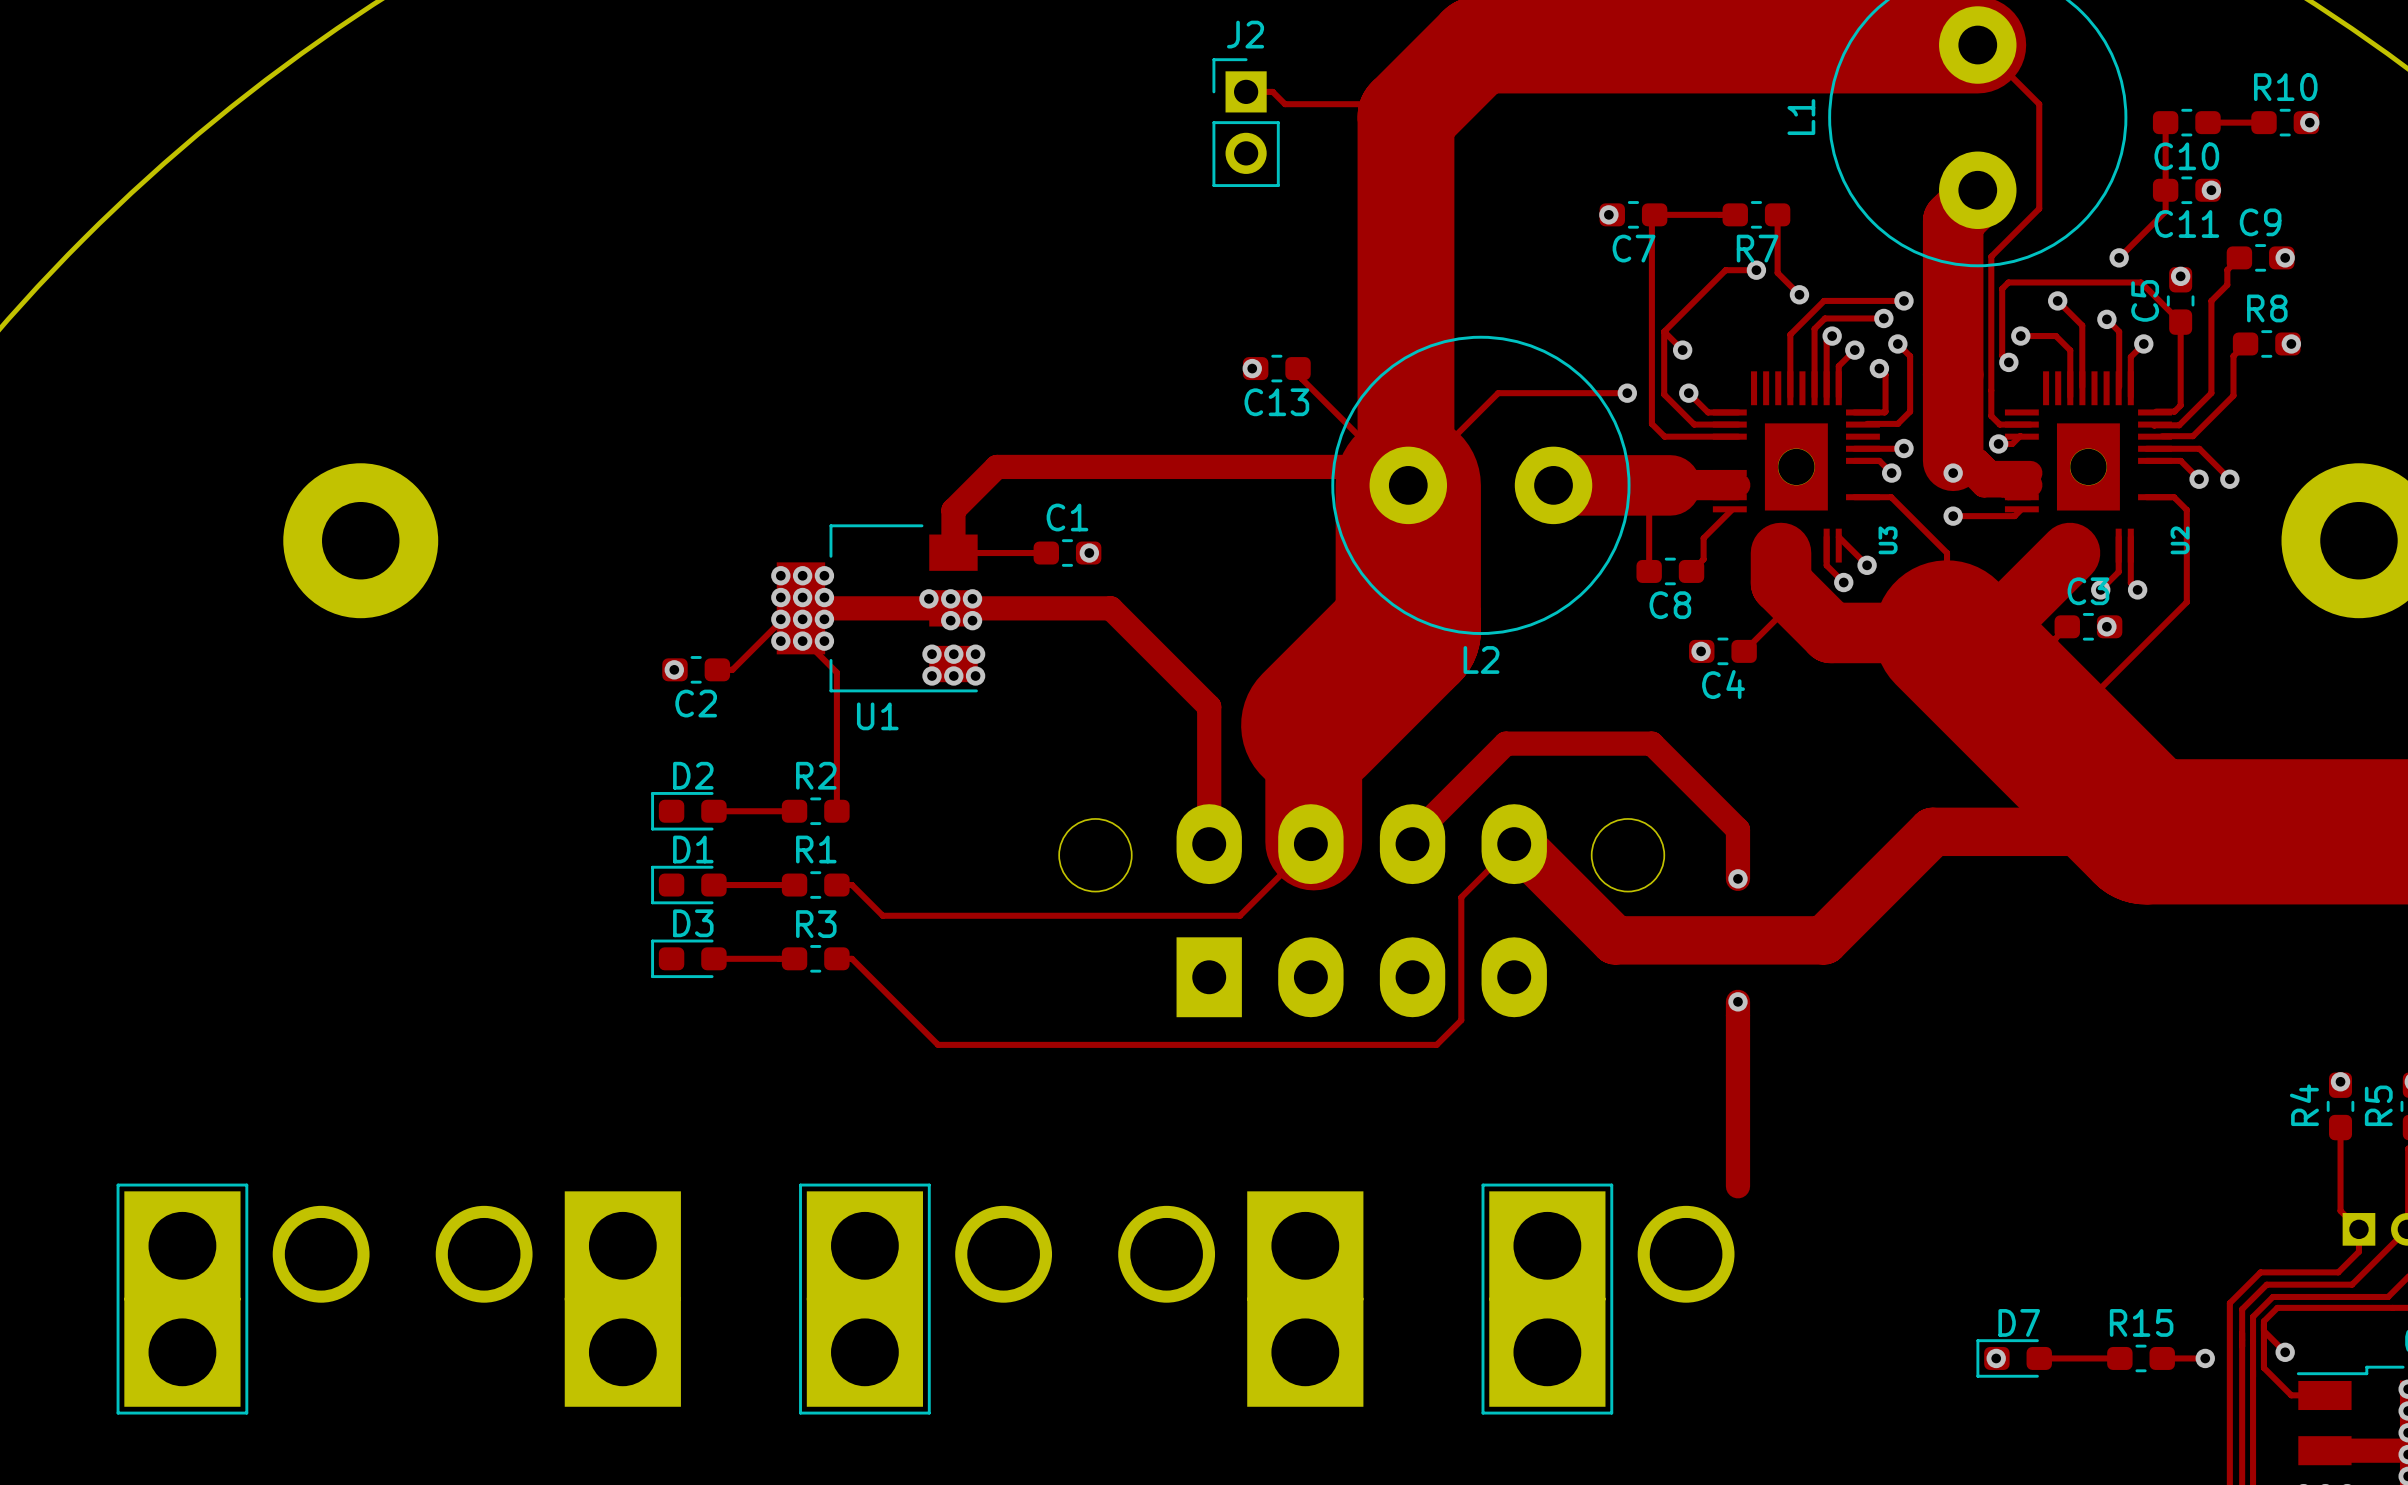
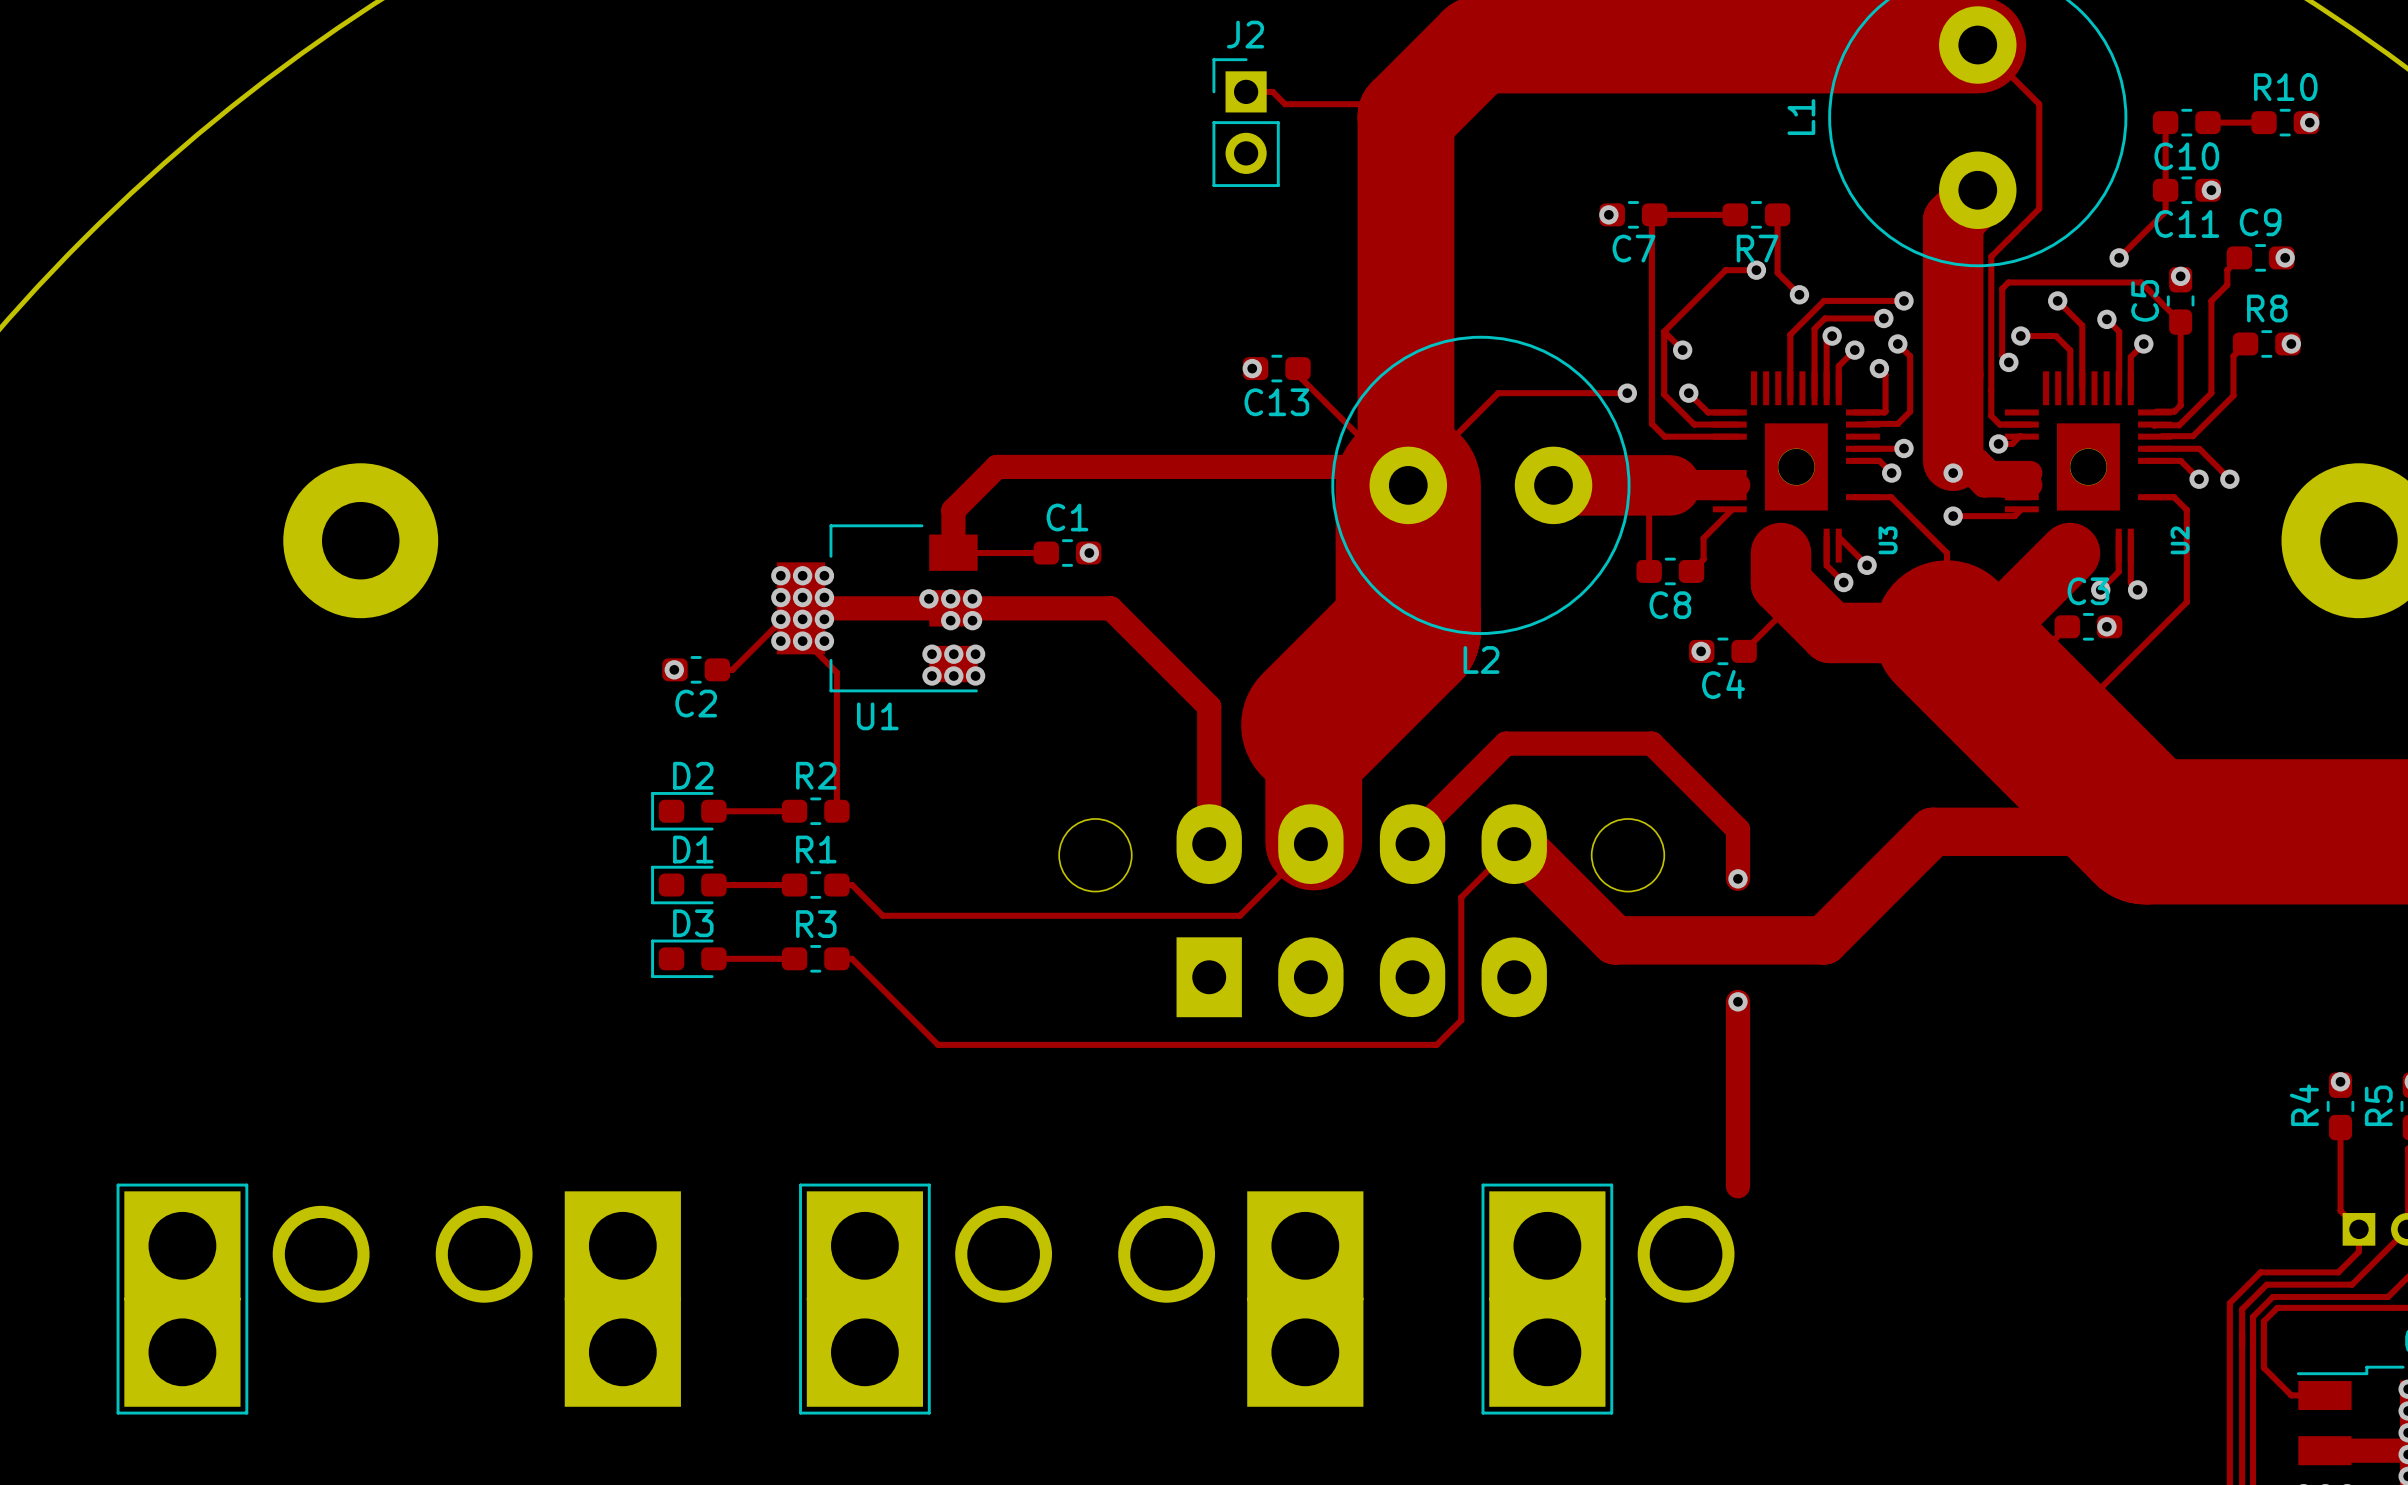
track: (2263, 1331) (2285, 1352) -> none
via: (2285, 1352) -> none
via: (1996, 1358) -> none
D7: (2014, 1358) -> none
track: (2039, 1358) (2119, 1358) -> none
R15: (2141, 1358) -> none
track: (2162, 1358) (2205, 1358) -> none
via: (2205, 1358) -> none

